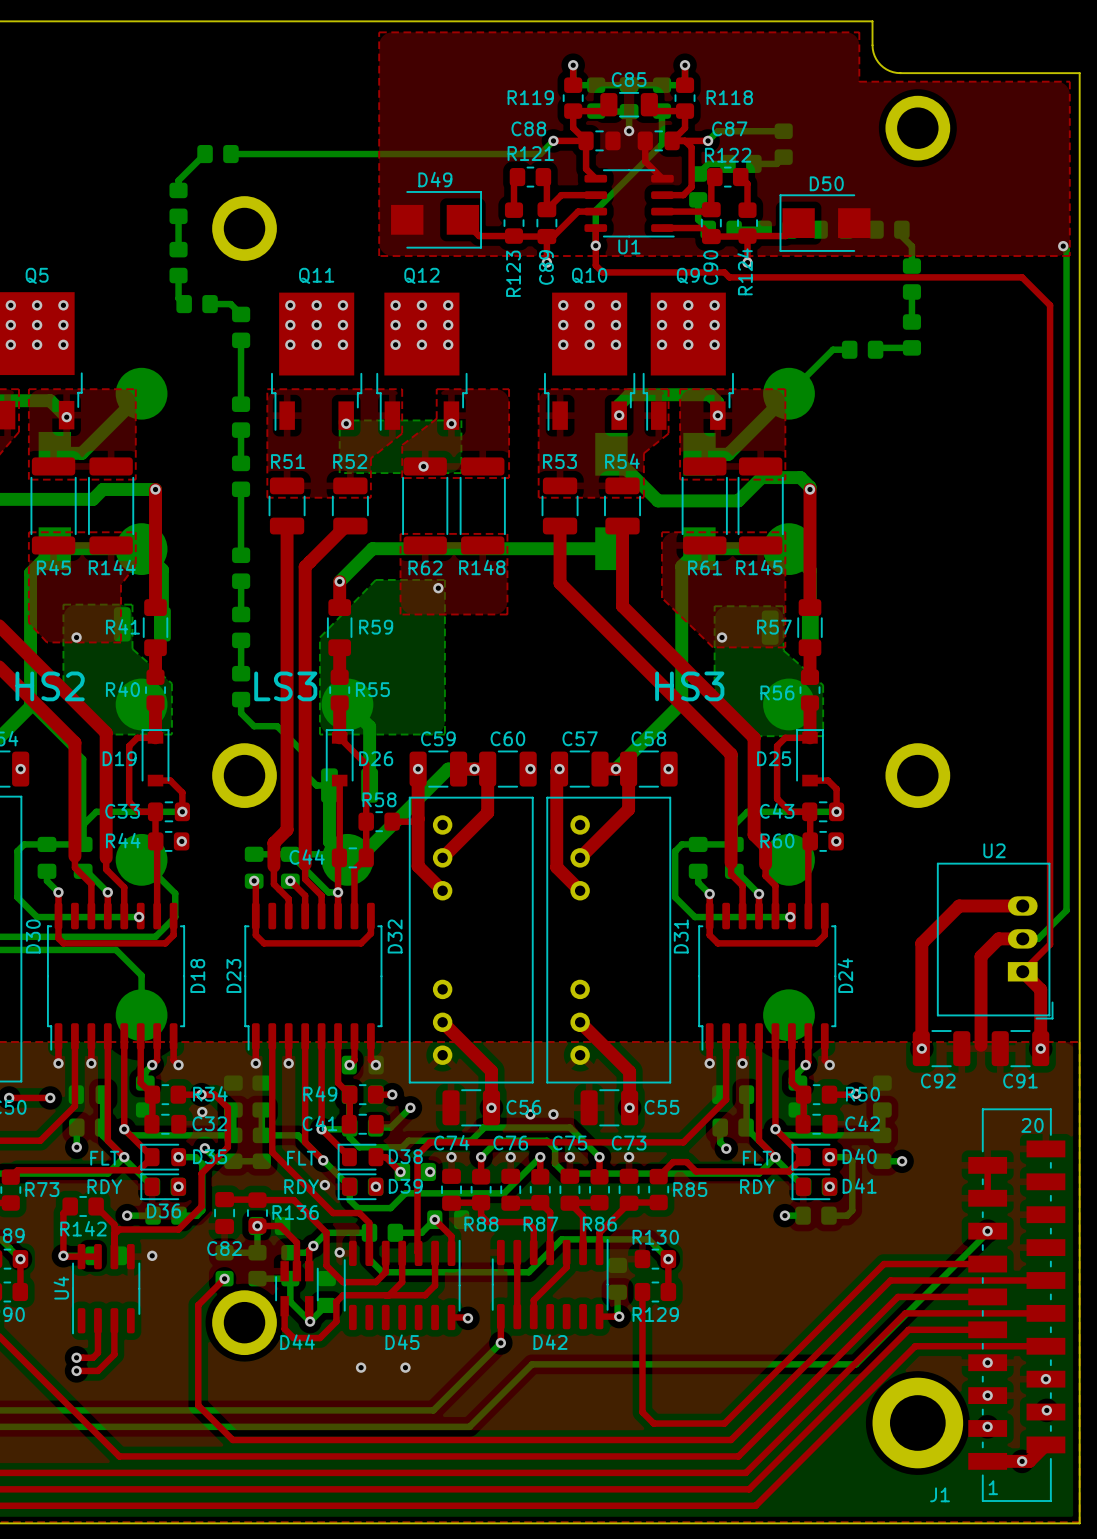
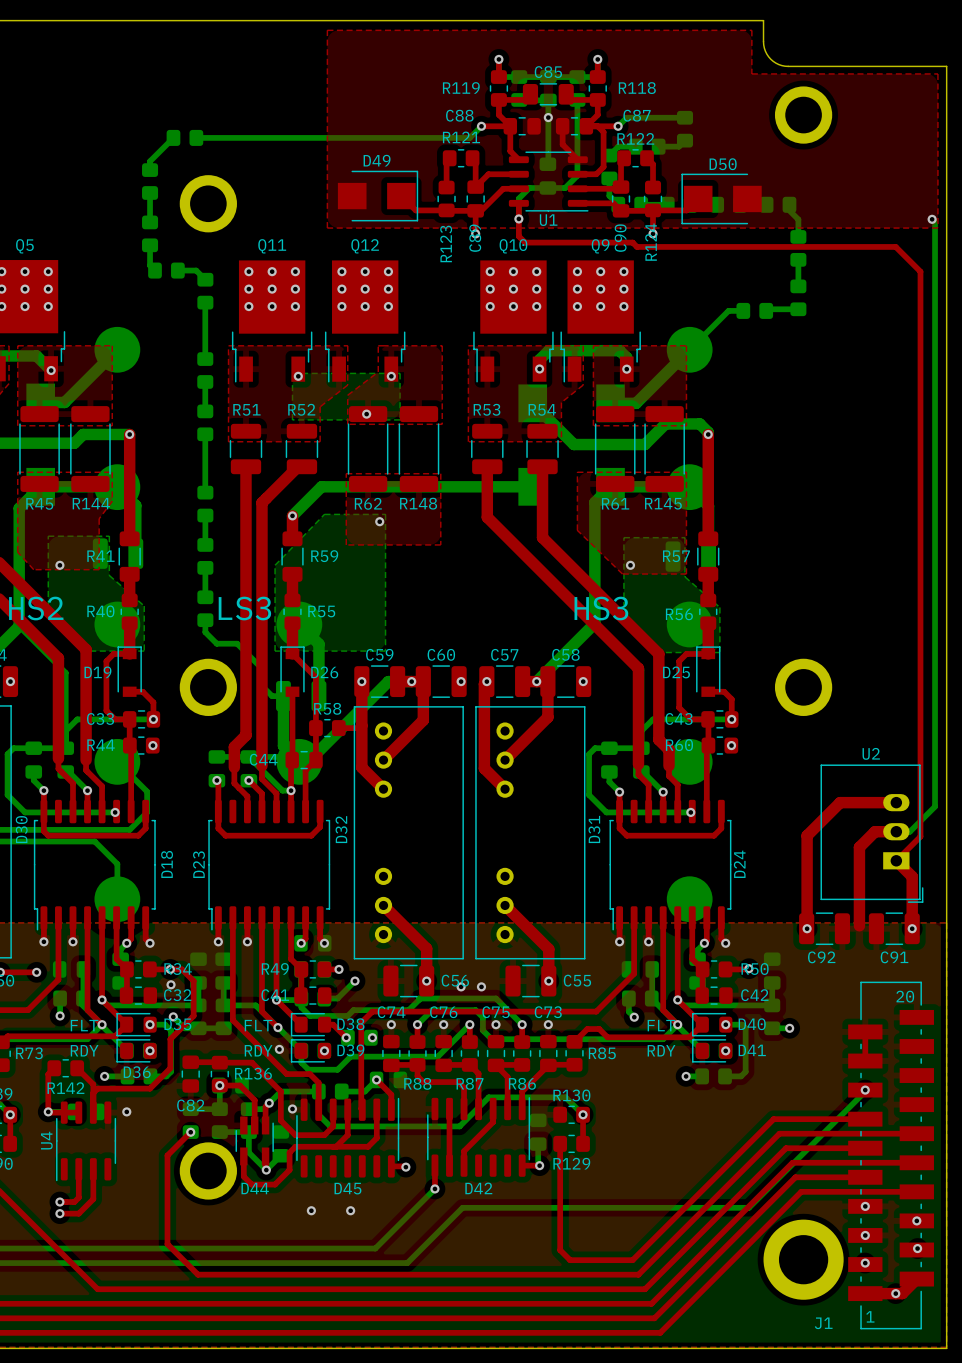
bottom track: none -> (548, 117) (547, 164)
bottom track: (662, 144) (595, 210) (595, 222) -> (577, 129) (577, 175) (565, 188) (529, 188) (518, 198)
part: none -> (547, 176)

